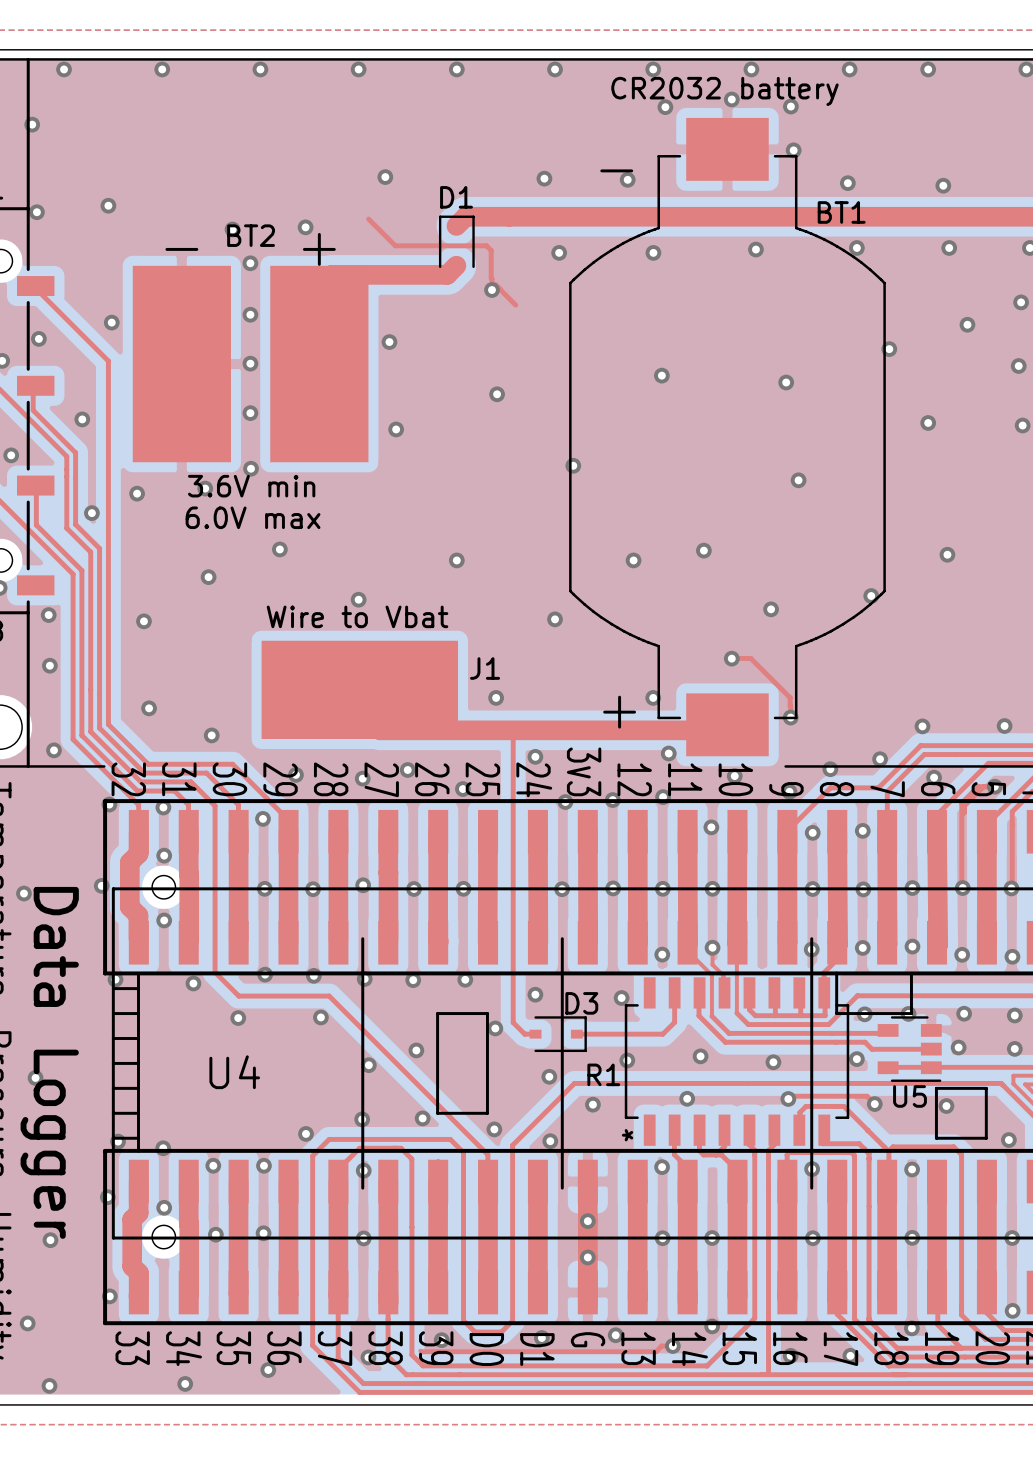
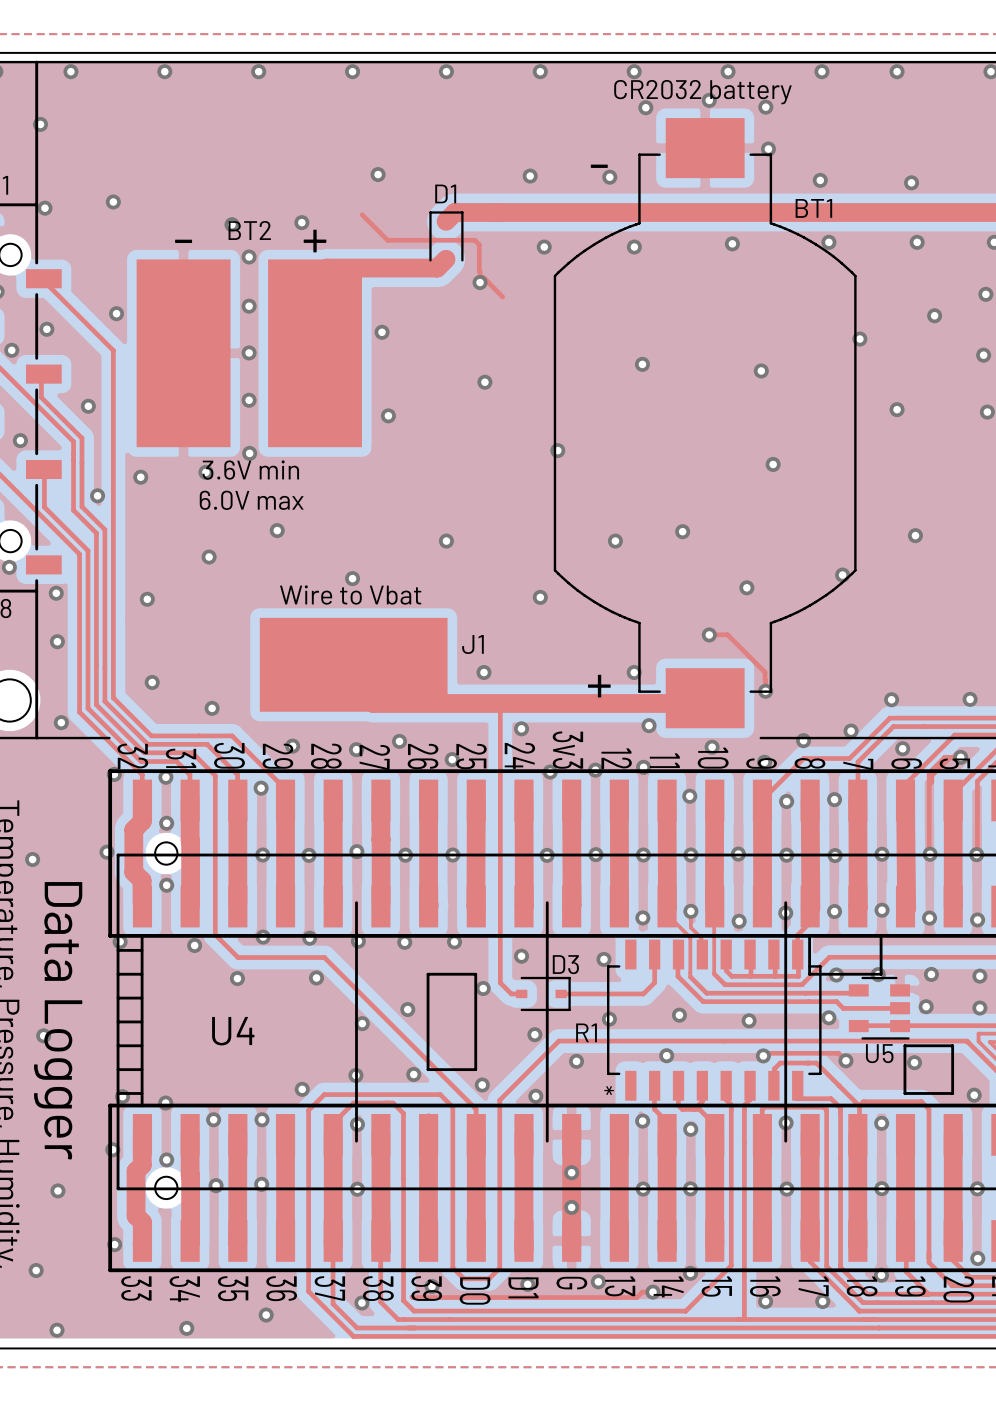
via: none -> (738, 854)
via: none -> (739, 921)
via: none -> (690, 1129)

